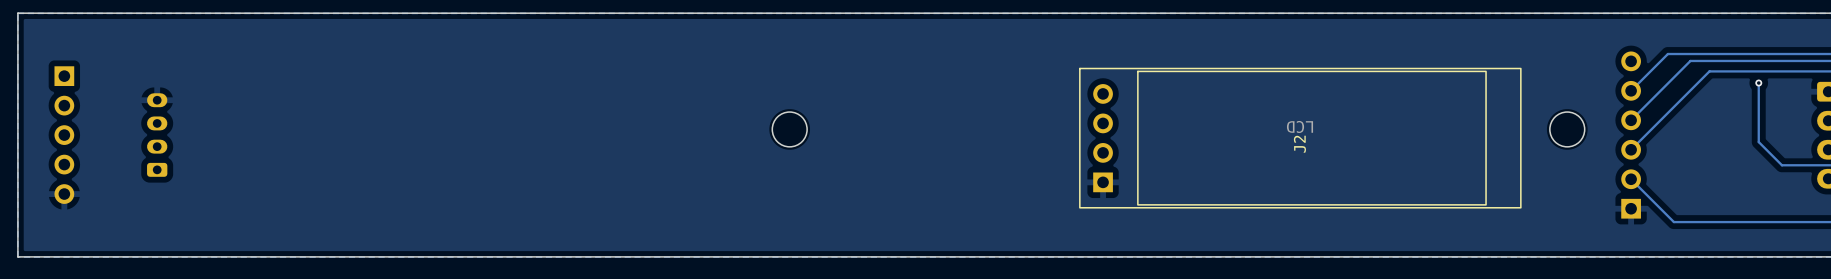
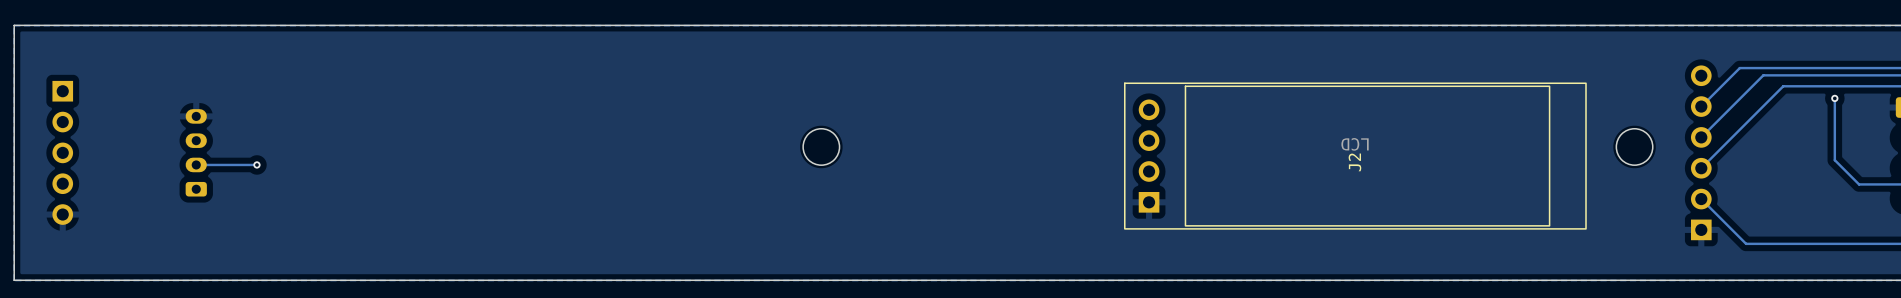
part position: (157, 135) -> (196, 152)
track: none -> (256, 164) (196, 164)
via: none -> (256, 164)

